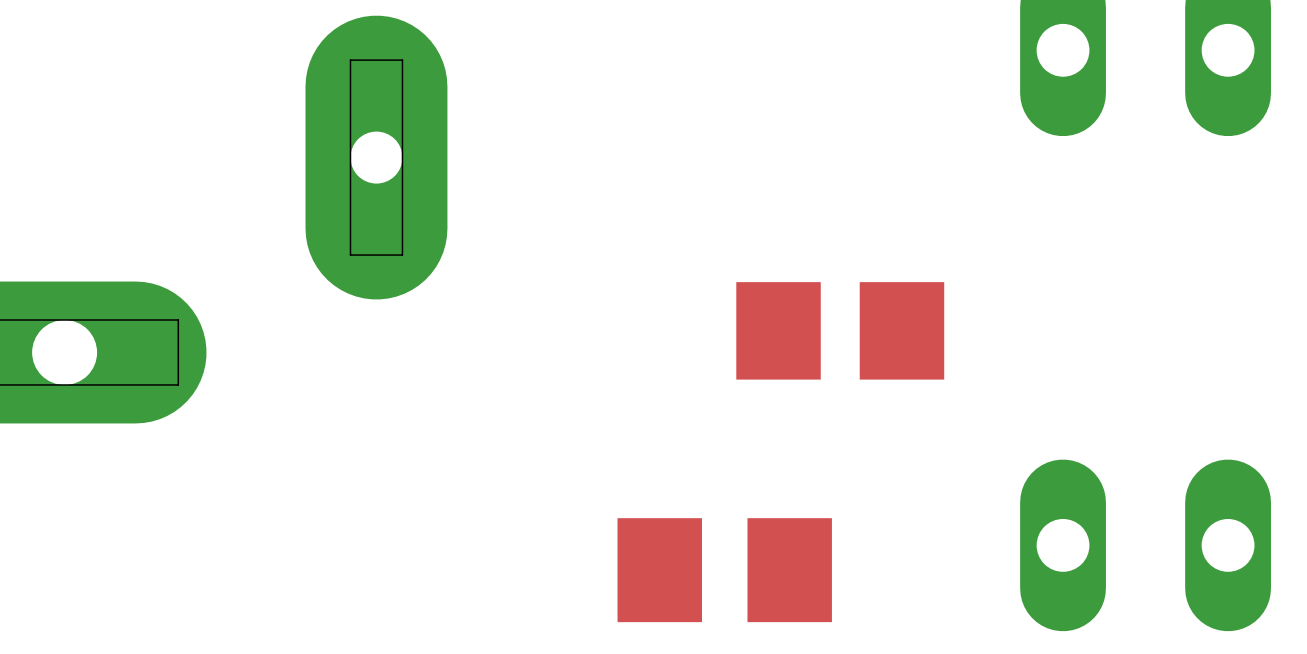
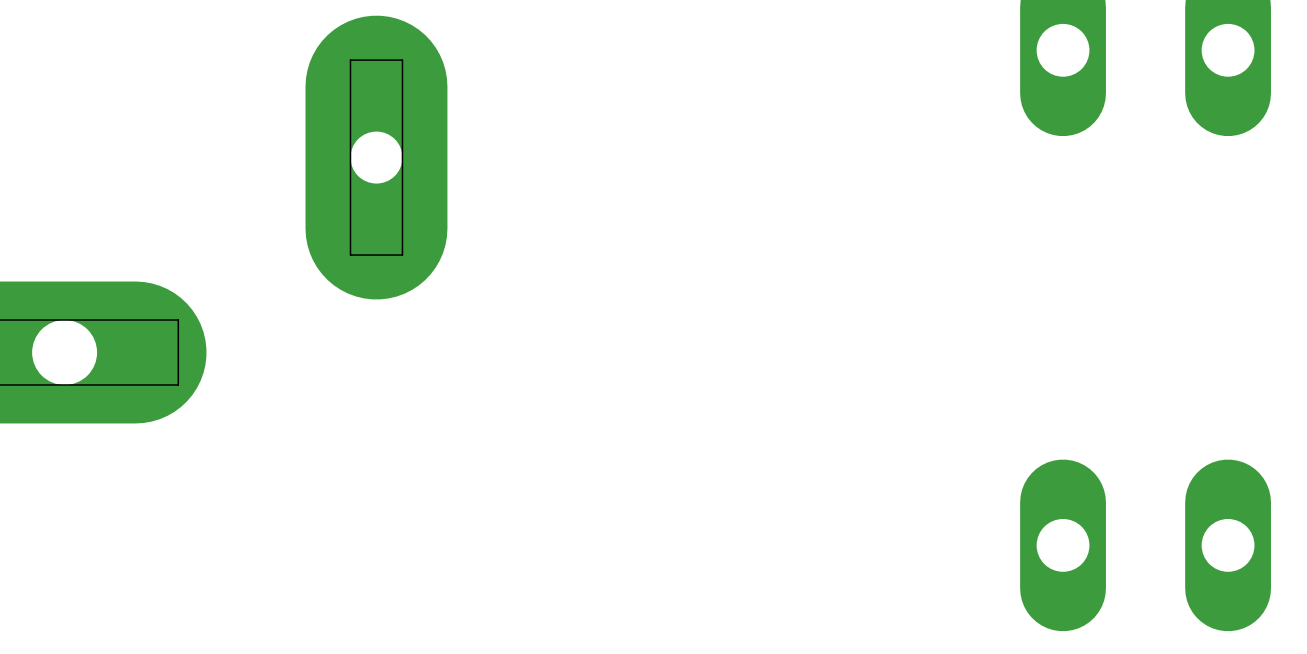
part: (840, 330) -> none
part: (724, 570) -> none

